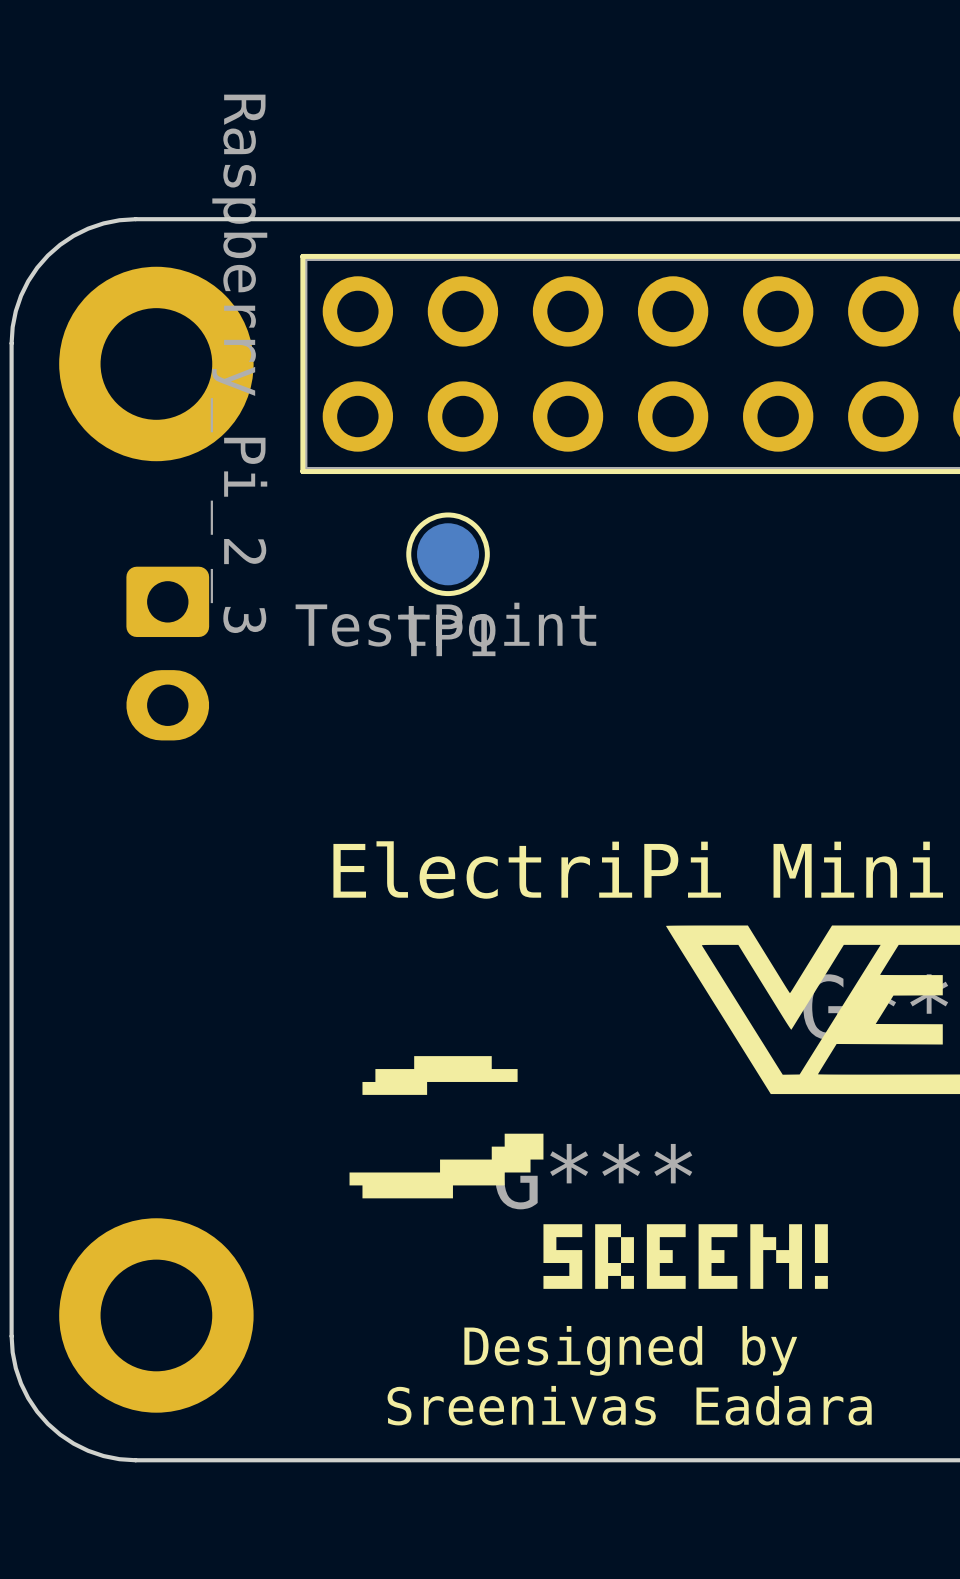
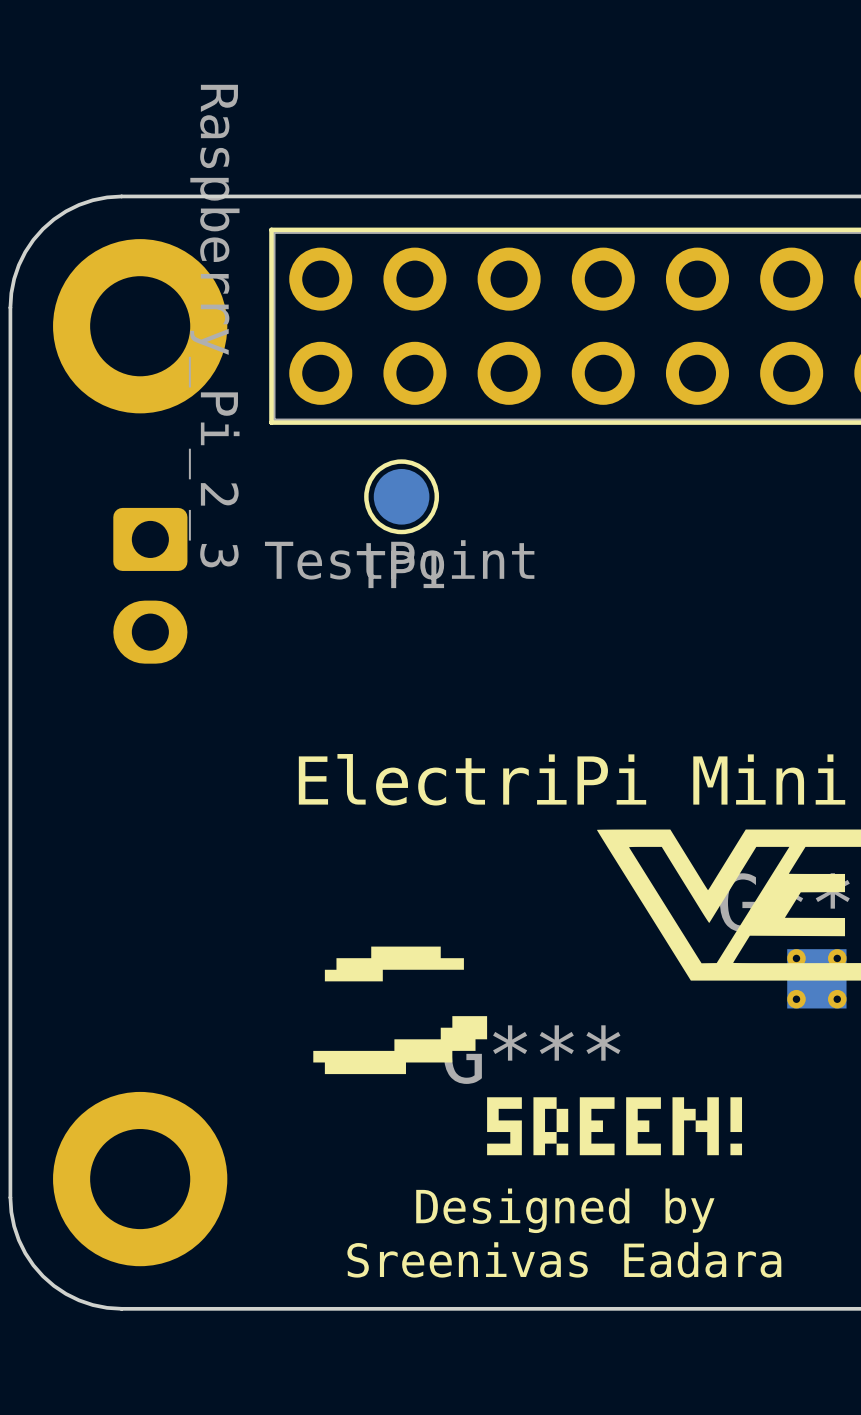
part: none -> (816, 978)

